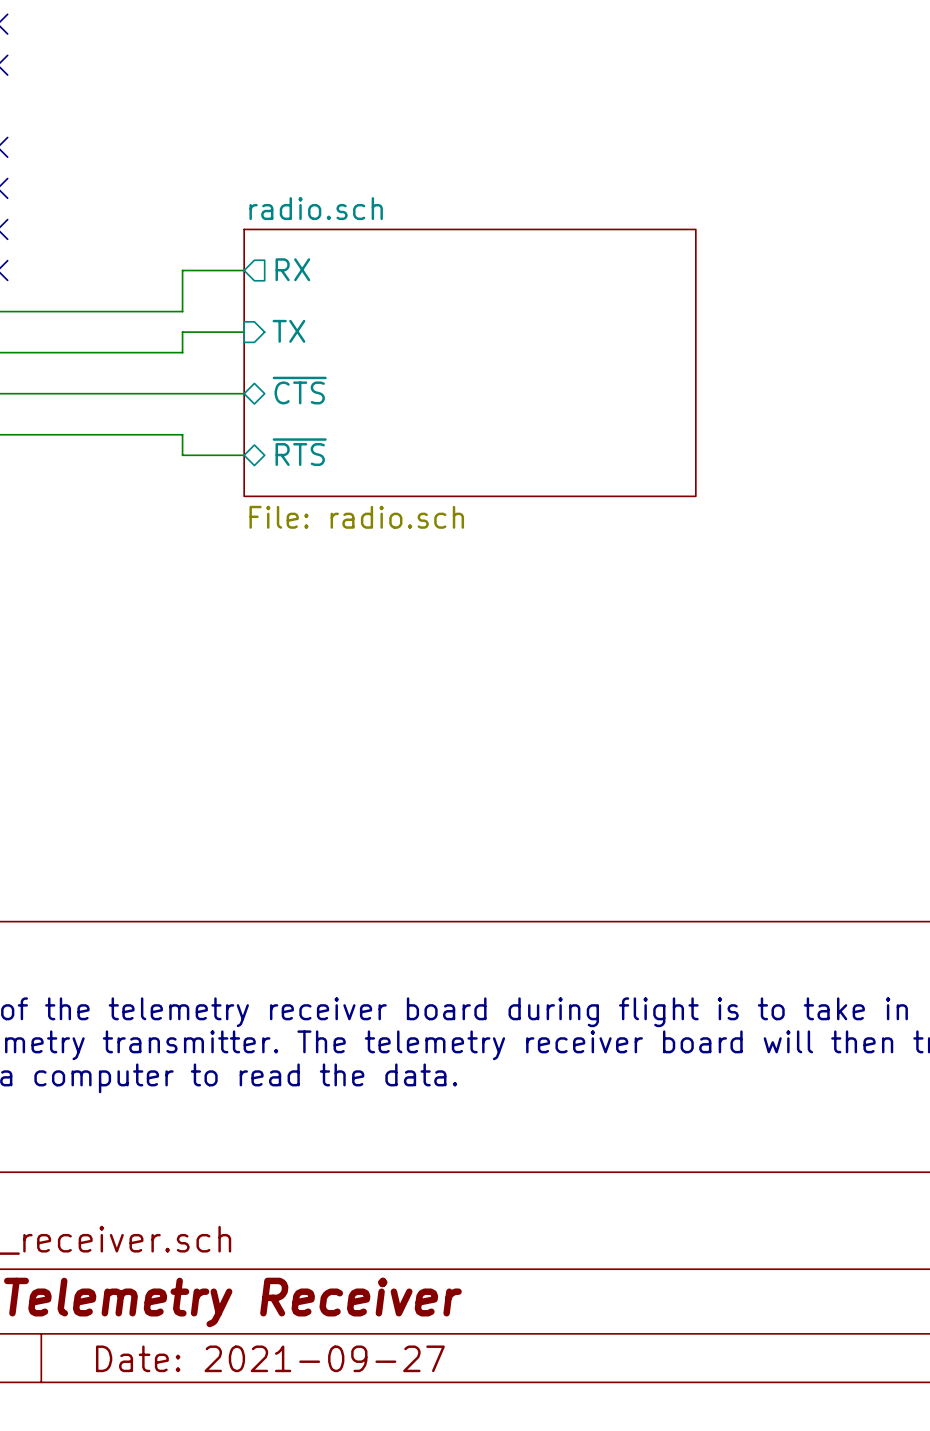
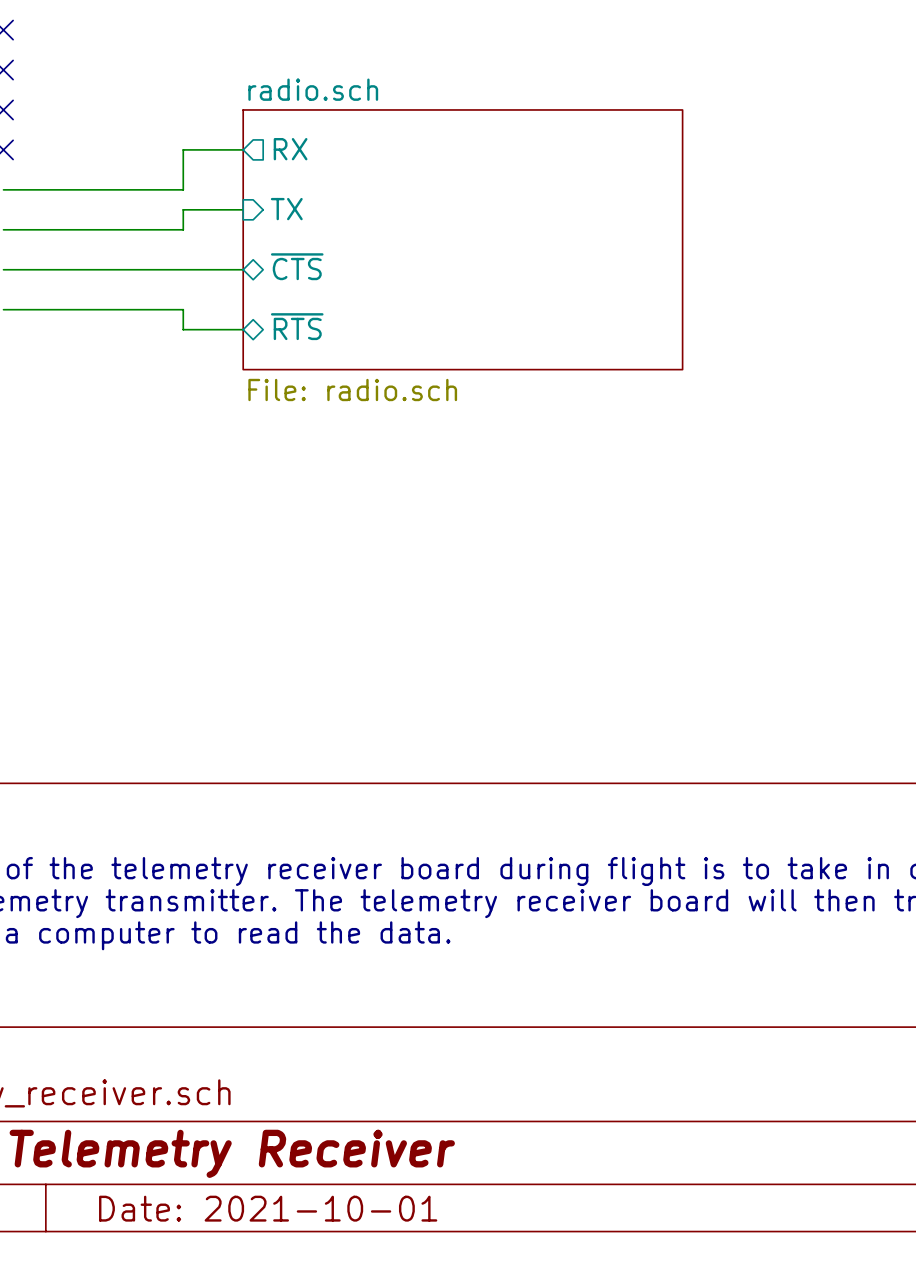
title block: Date: 2021-09-27 (270, 1358) -> Date: 2021-10-01 (268, 1208)

